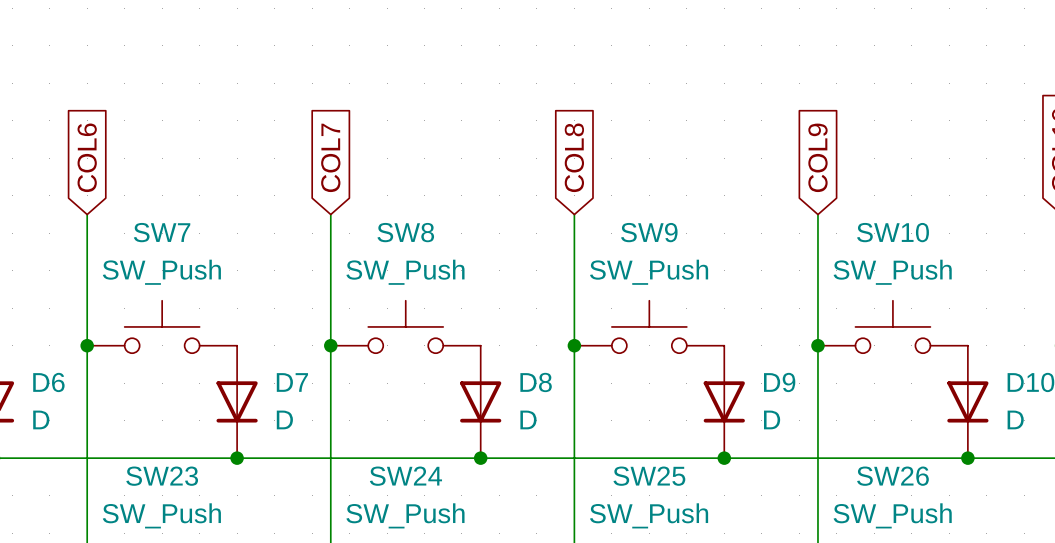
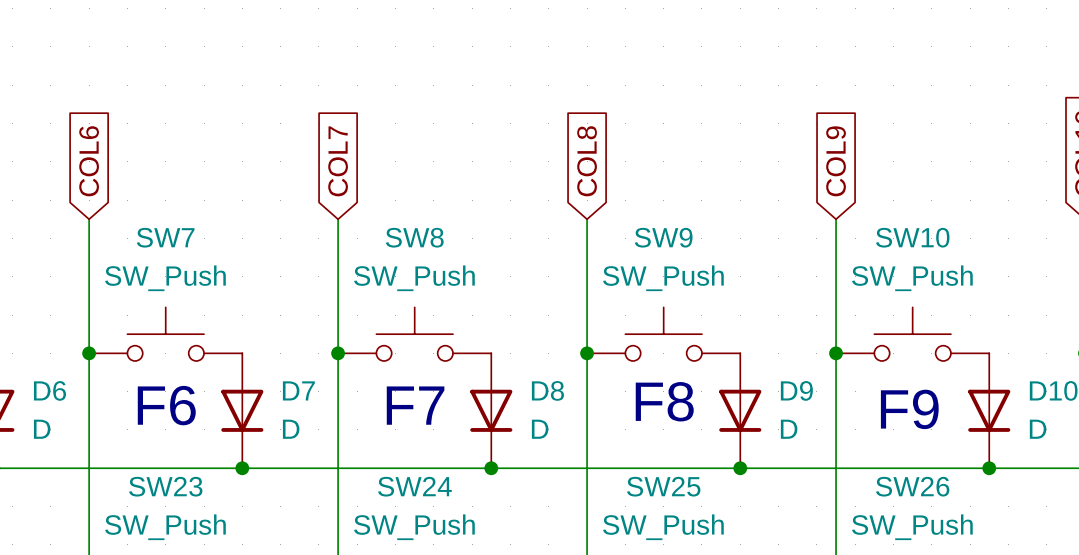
text: none -> F8 (664, 401)
text: none -> F6 (166, 405)
text: none -> F7 (415, 405)
text: none -> F9 (909, 409)

